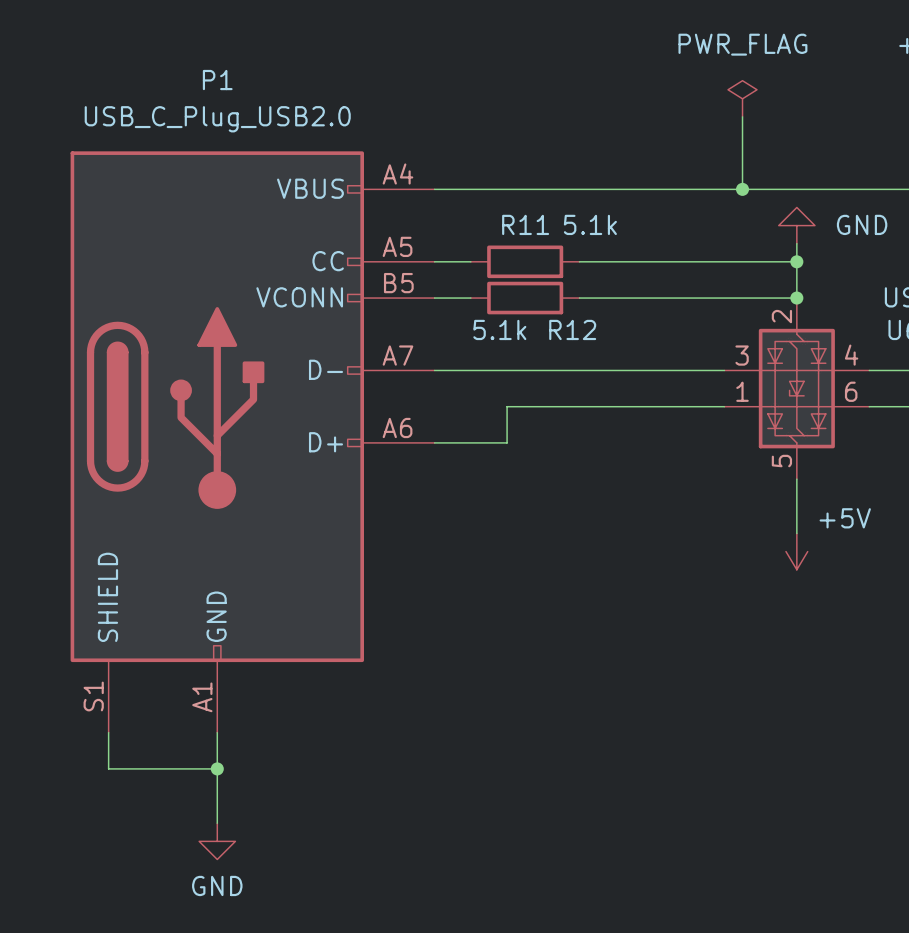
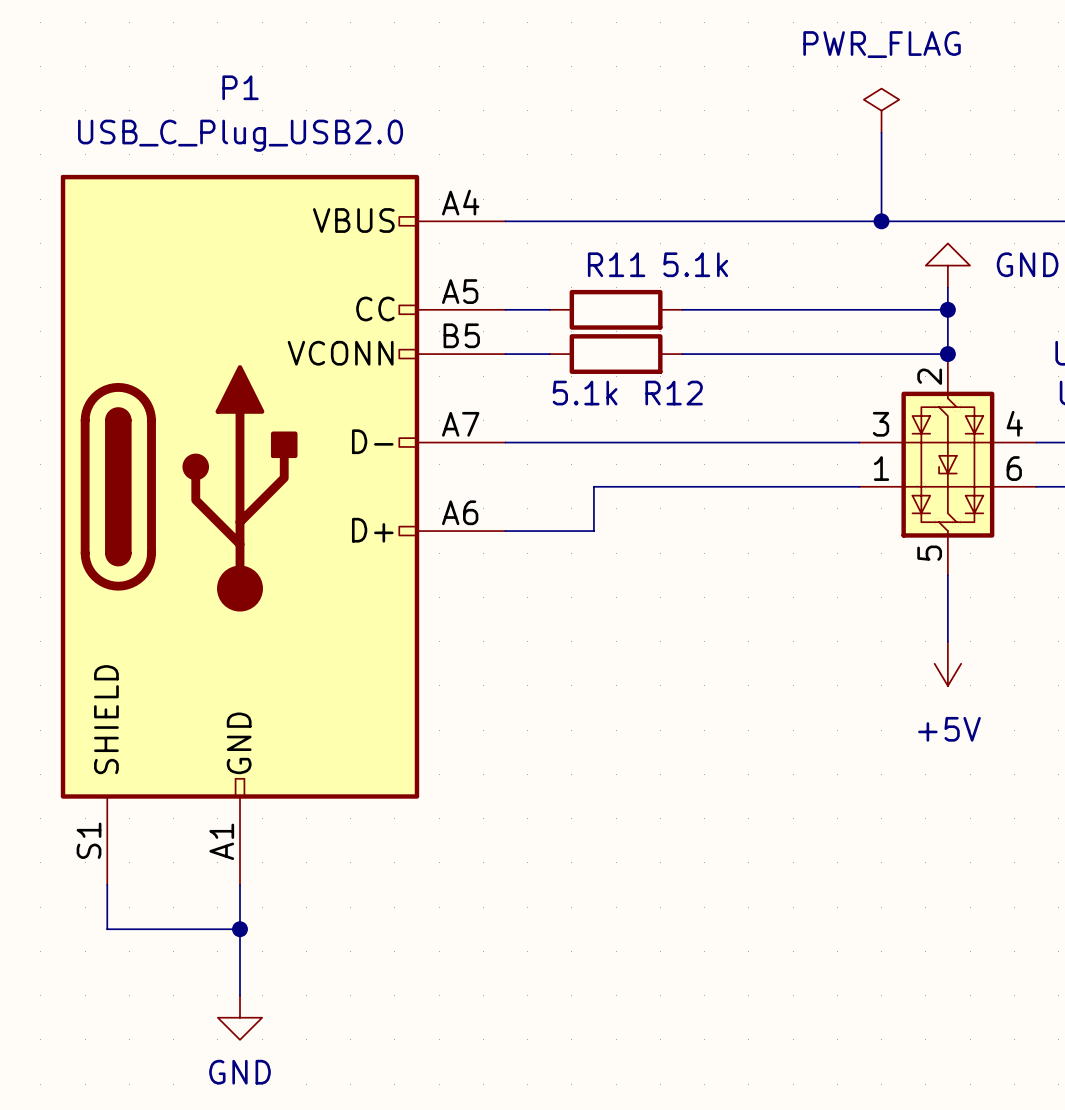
power symbol text position: +5V (845, 518) -> +5V (949, 729)

